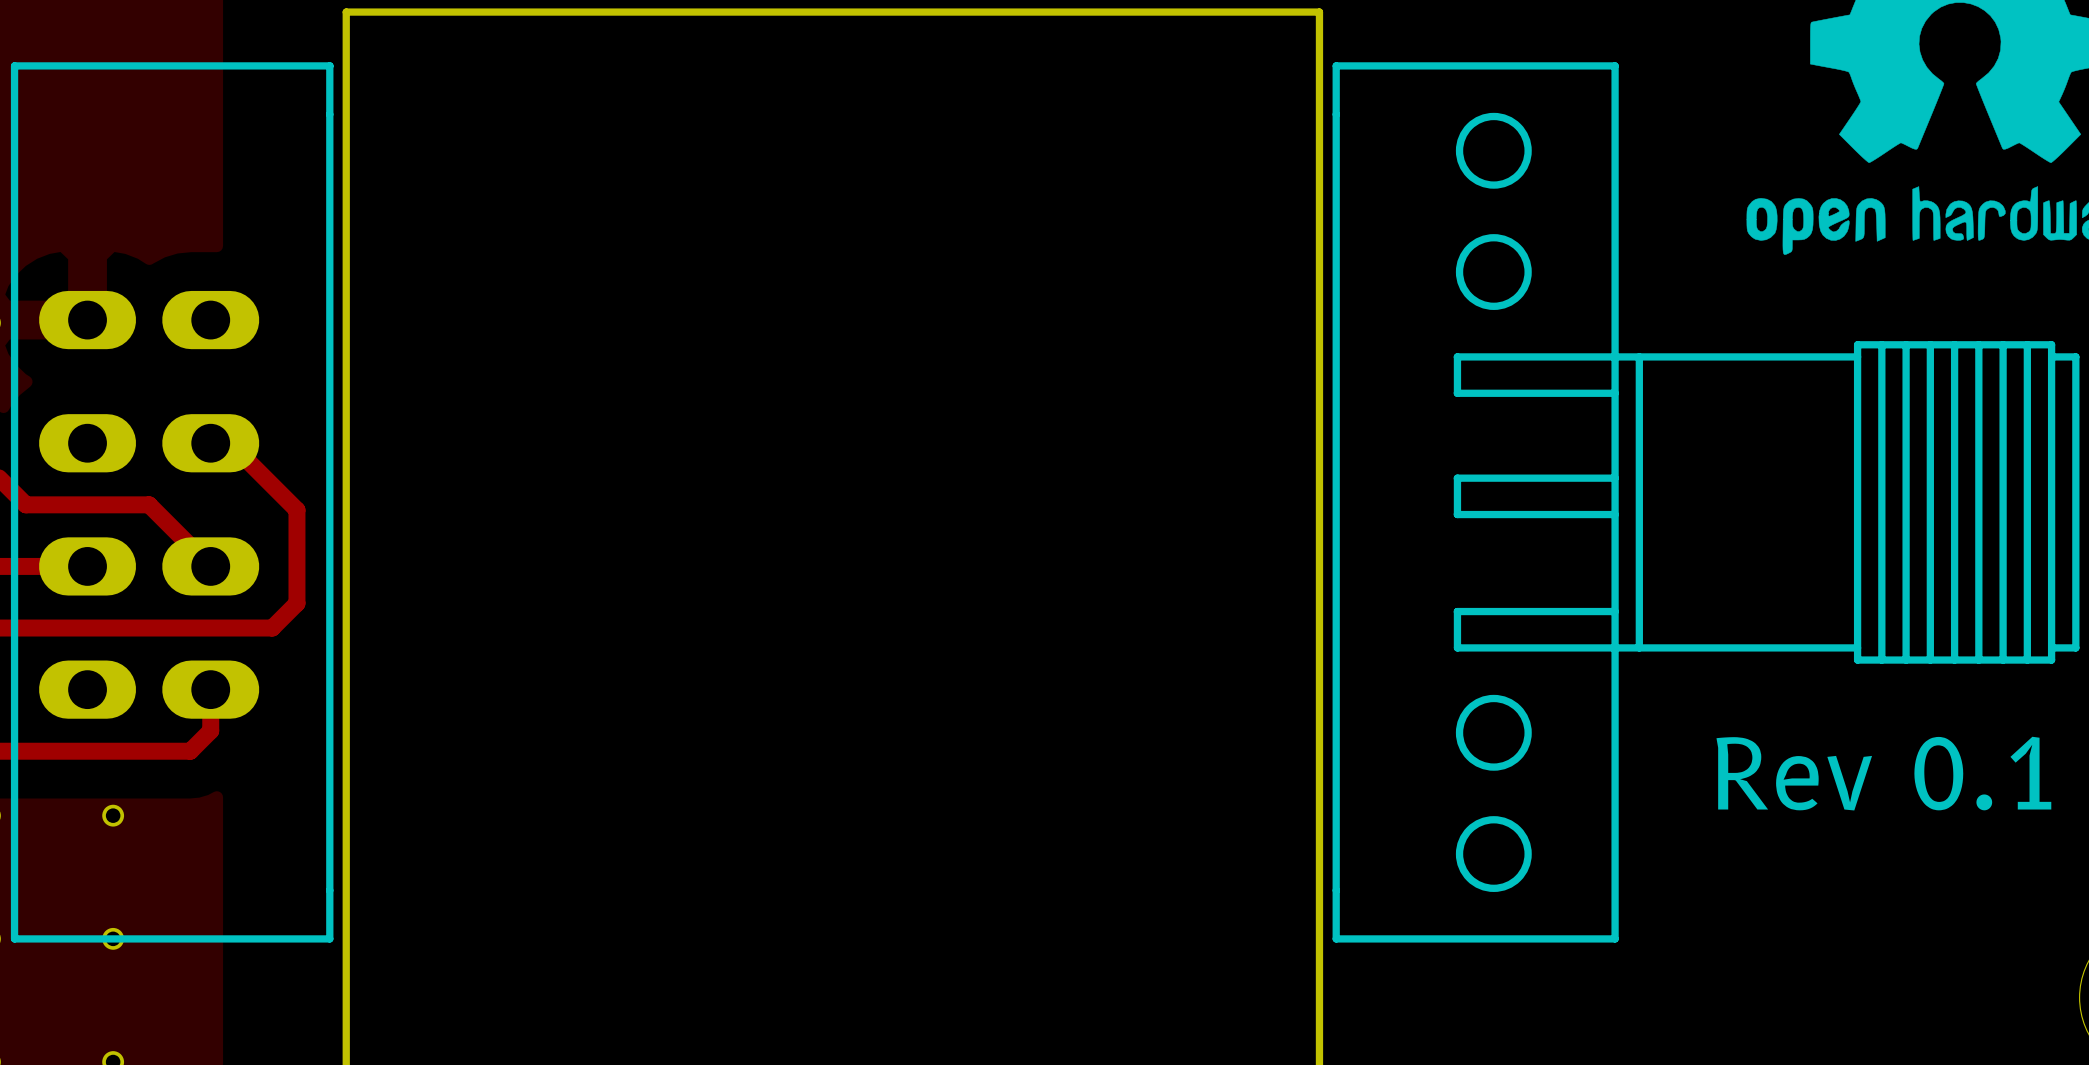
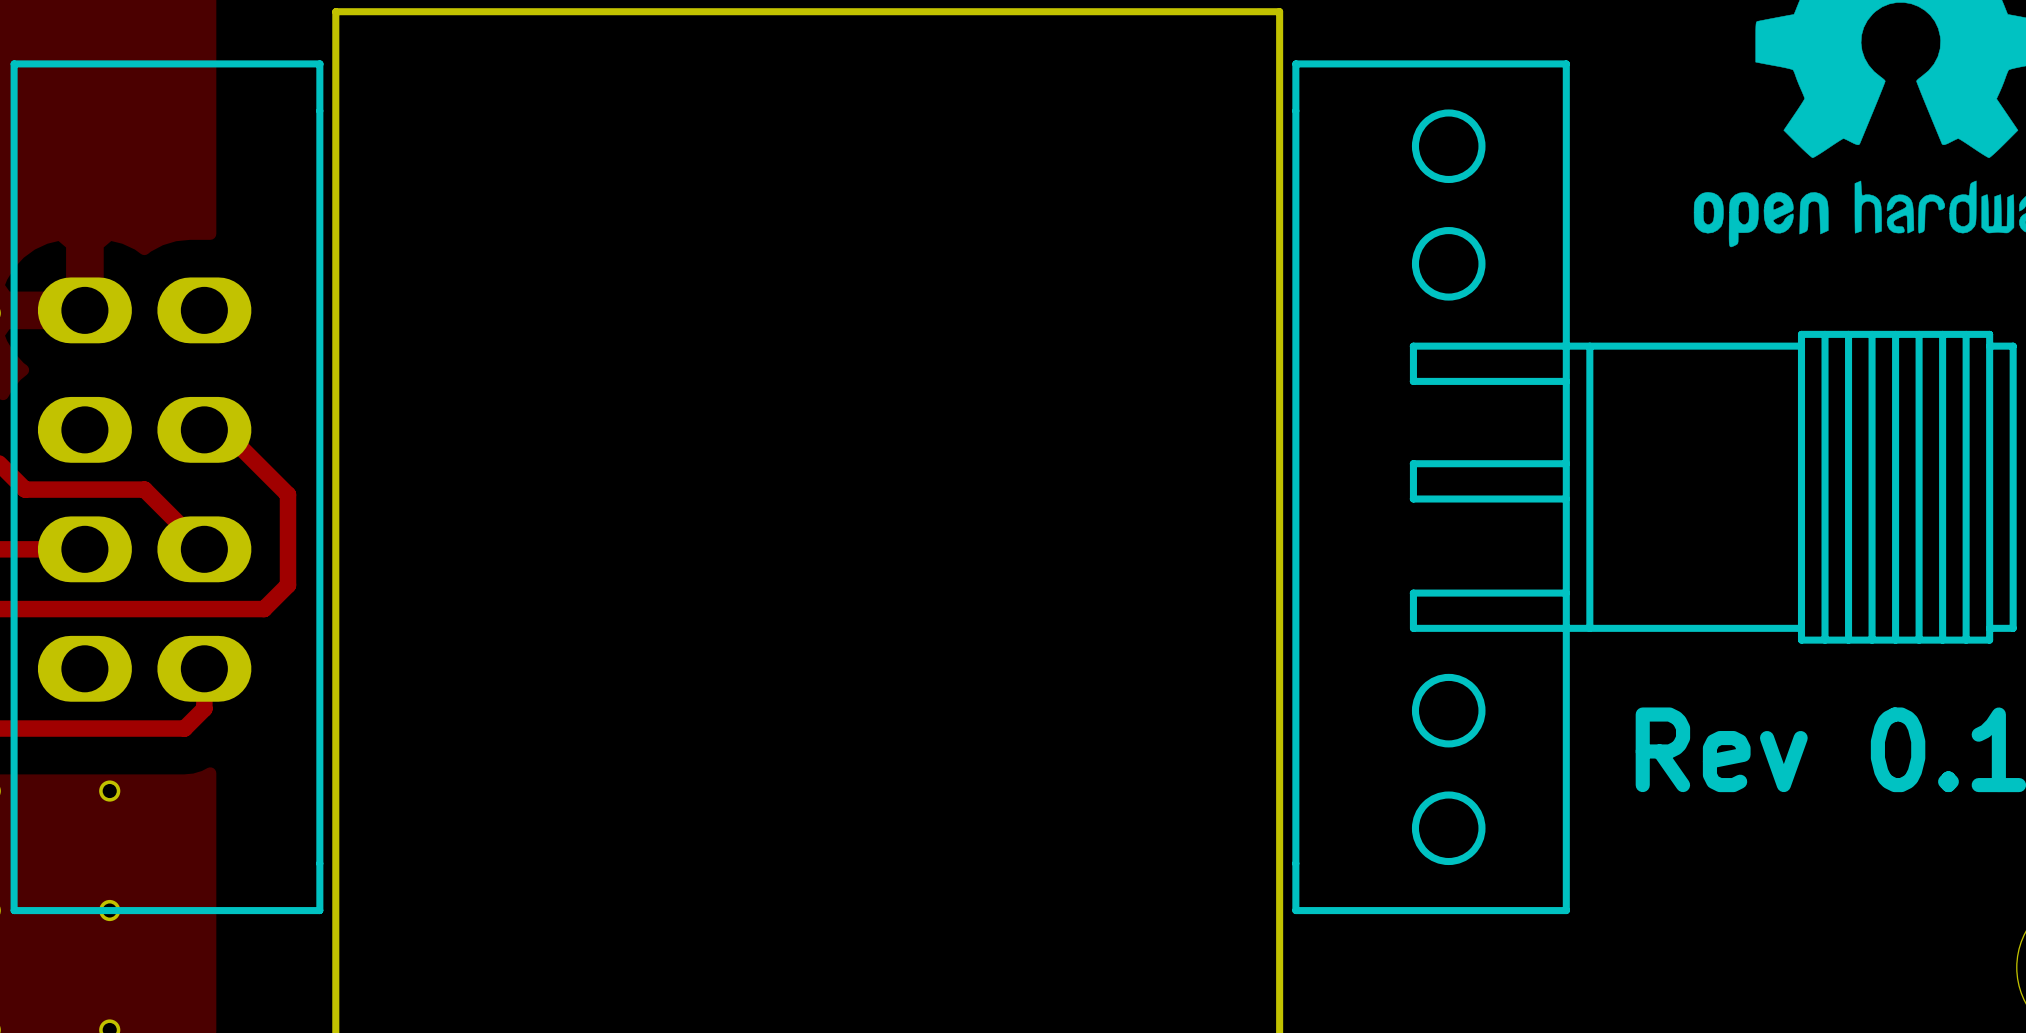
part footprint: [10, 62, 2080, 943] -> [10, 60, 2017, 915]

